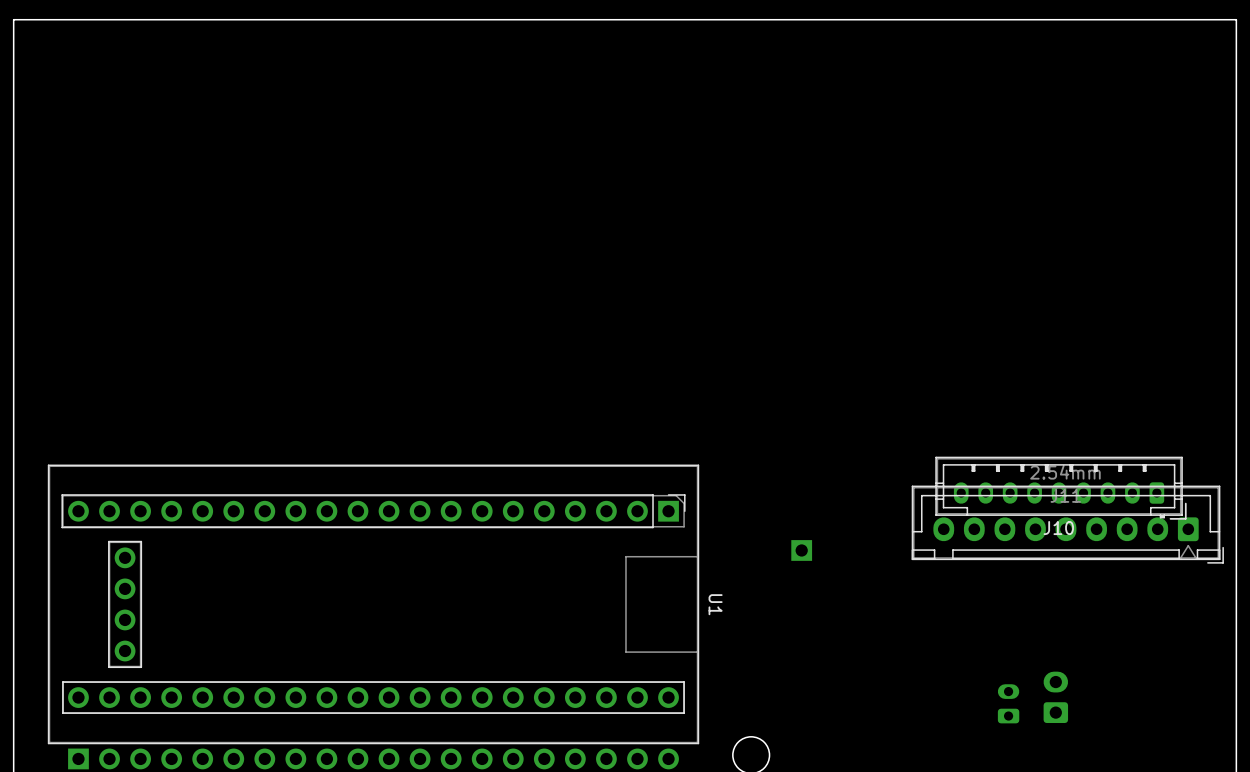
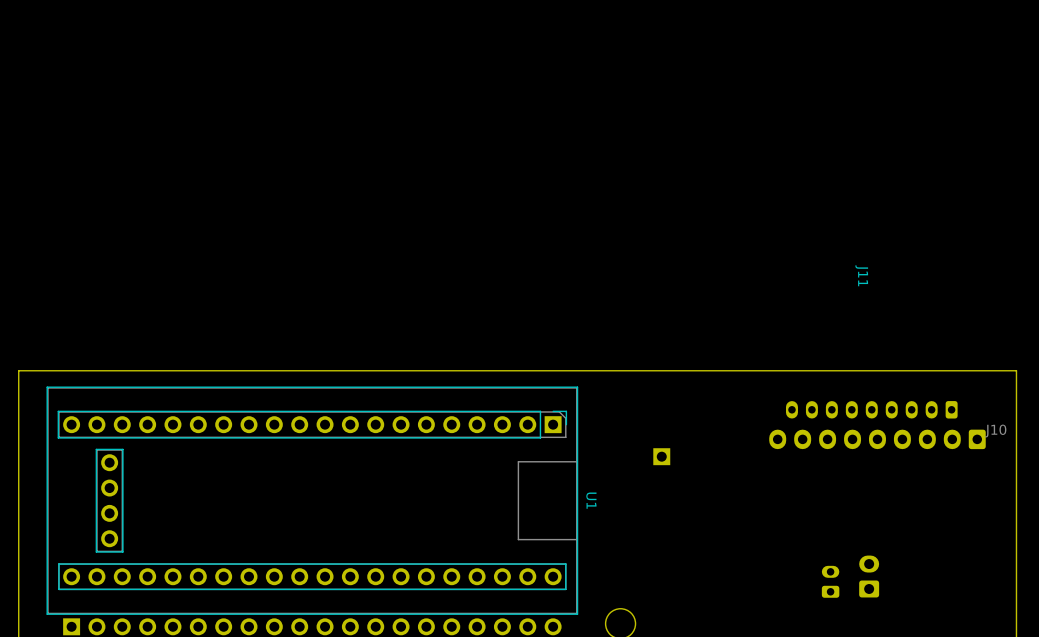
board edge: (1236, 445) (1236, 19) (13, 19) (13, 445) -> (1016, 370) (18, 370)
J10 side: bottom (1060, 488) -> top (871, 409)
J11 side: bottom (1067, 524) -> top (877, 439)

